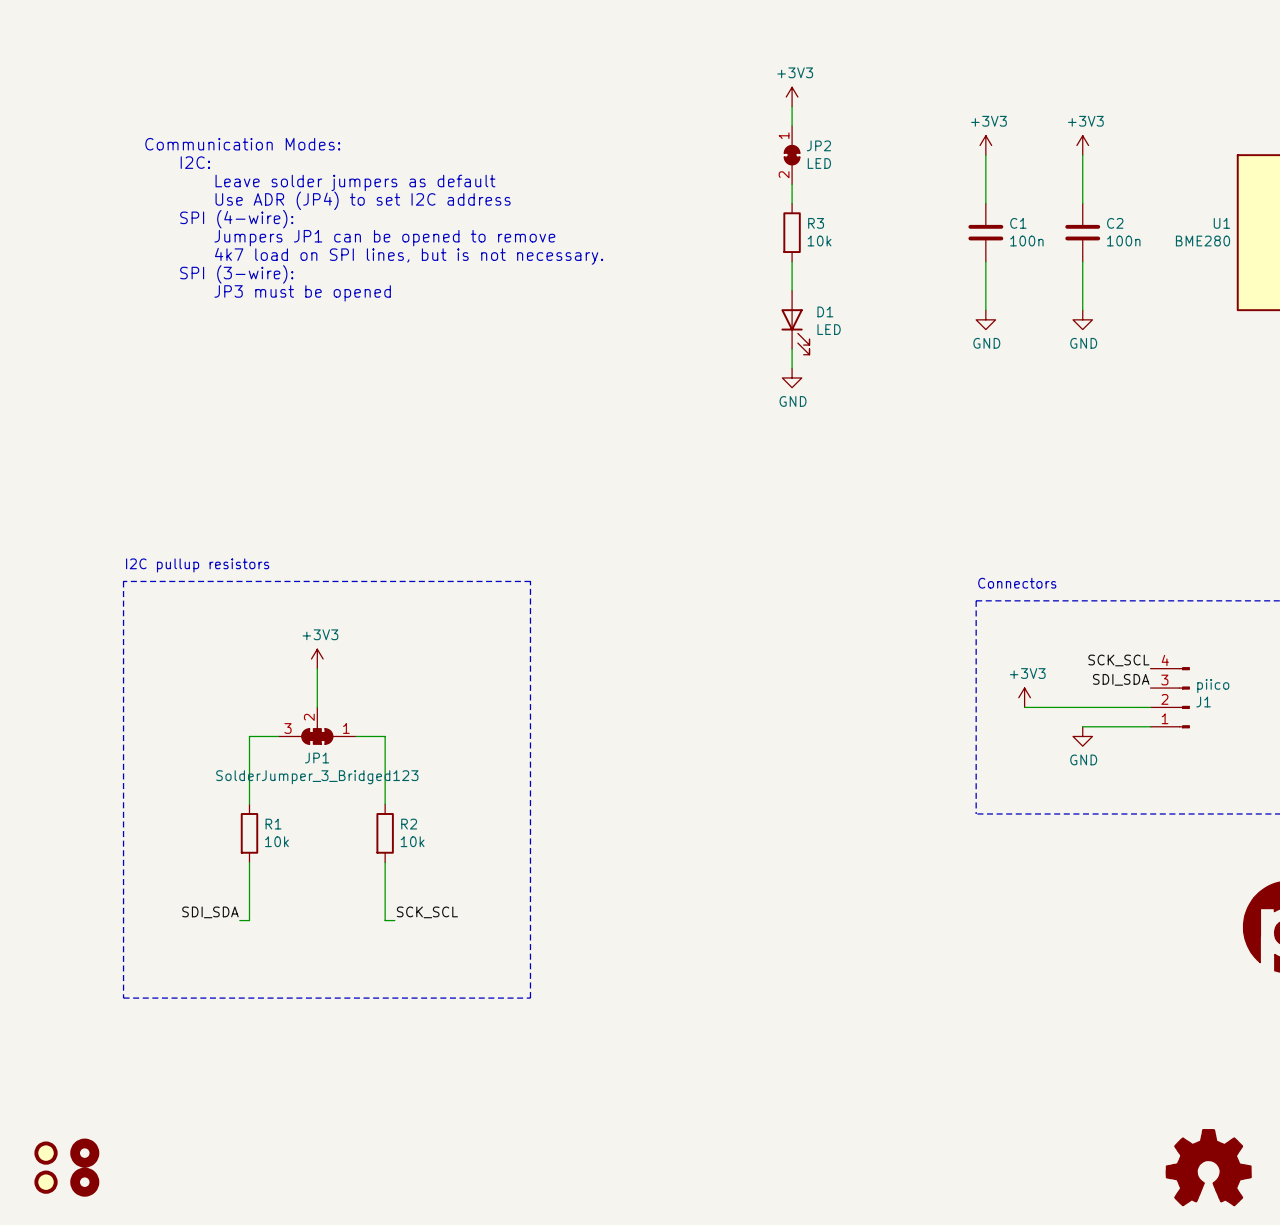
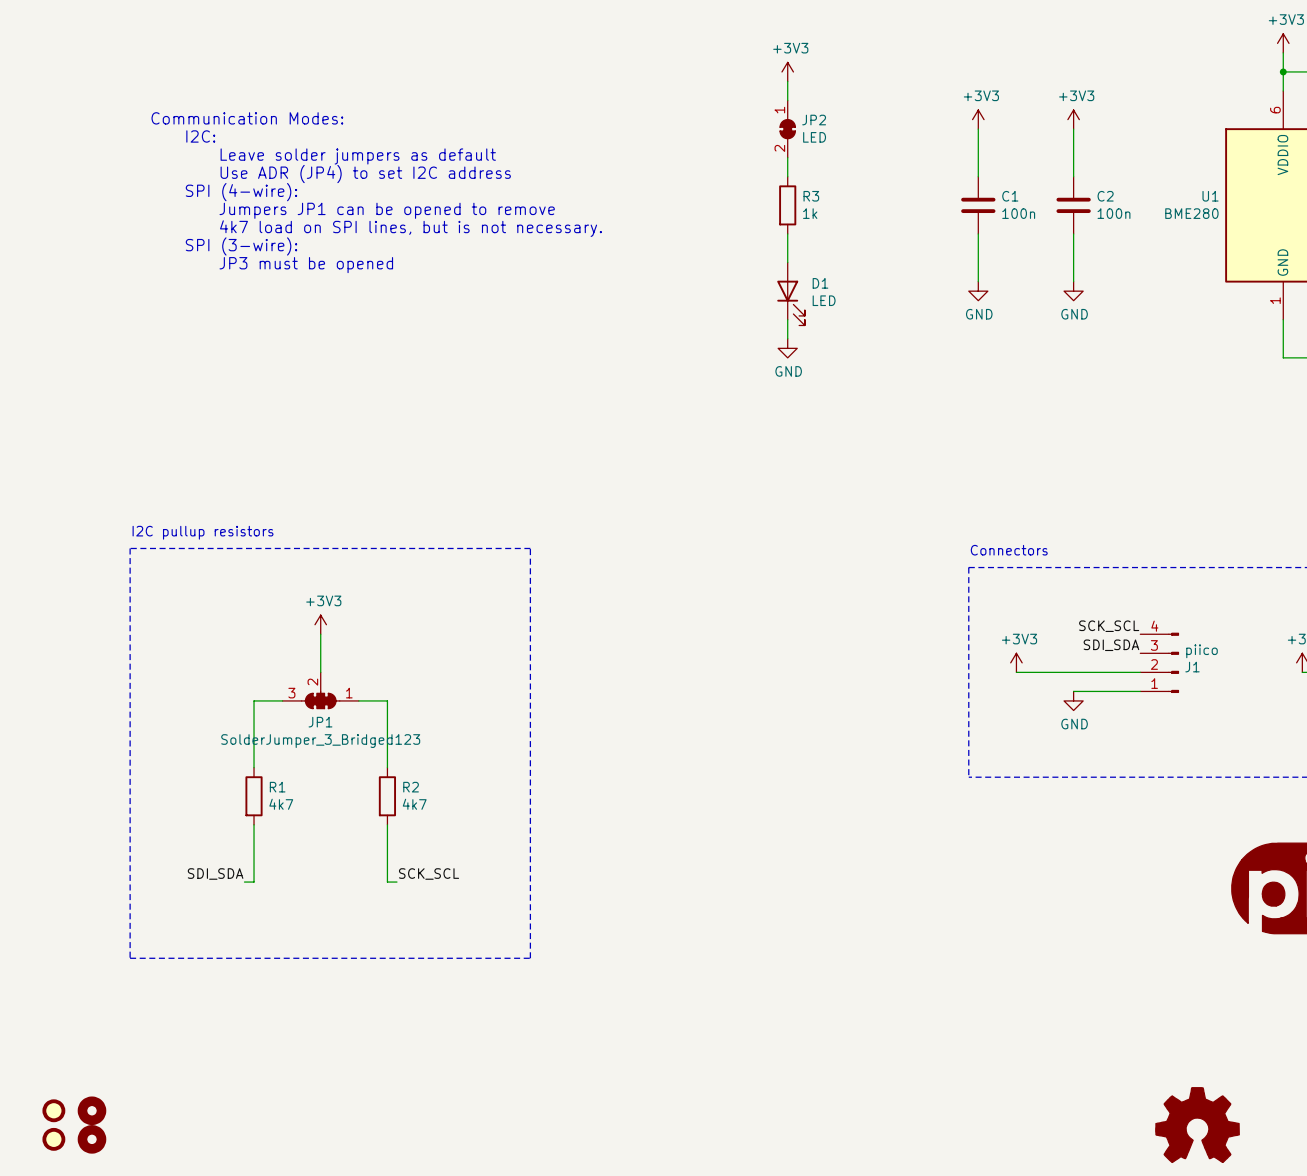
R3 value: 10k (819, 241) -> 1k (810, 213)
R1 value: 10k (276, 841) -> 4k7 (281, 804)
R2 value: 10k (412, 841) -> 4k7 (414, 804)

